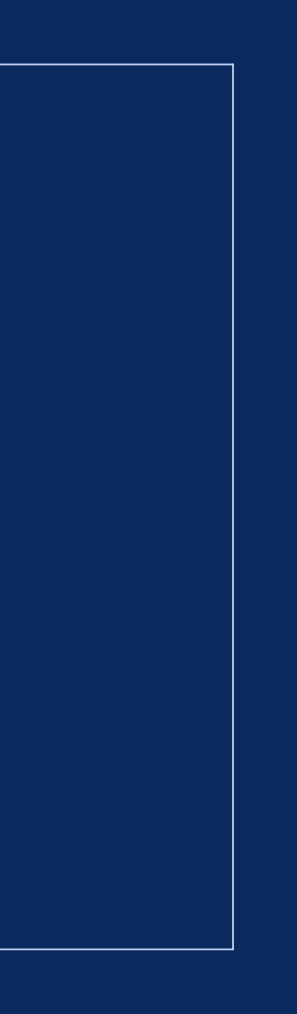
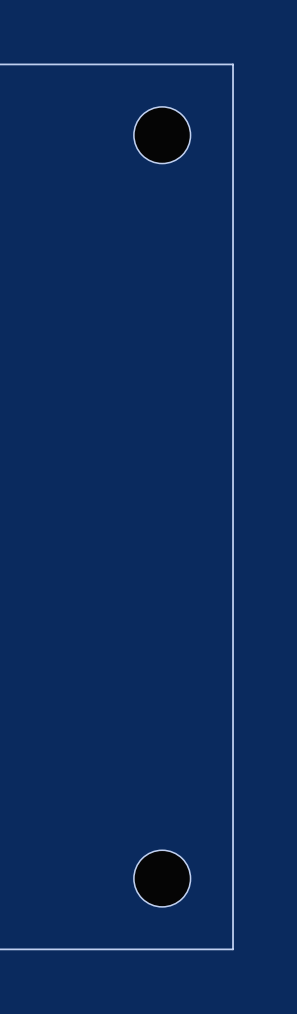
part: none -> (162, 135)
part: none -> (162, 878)

